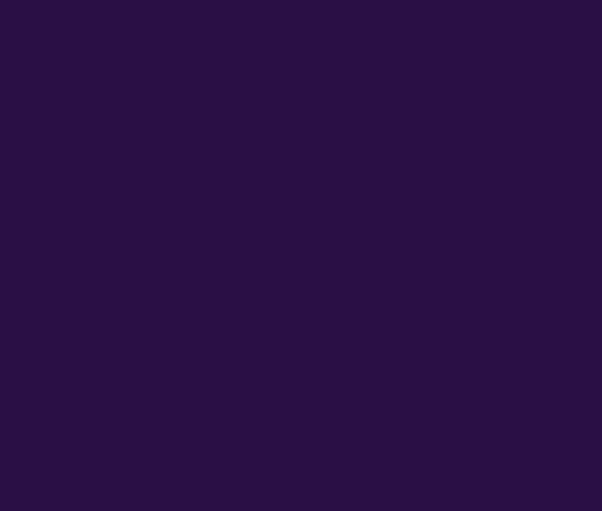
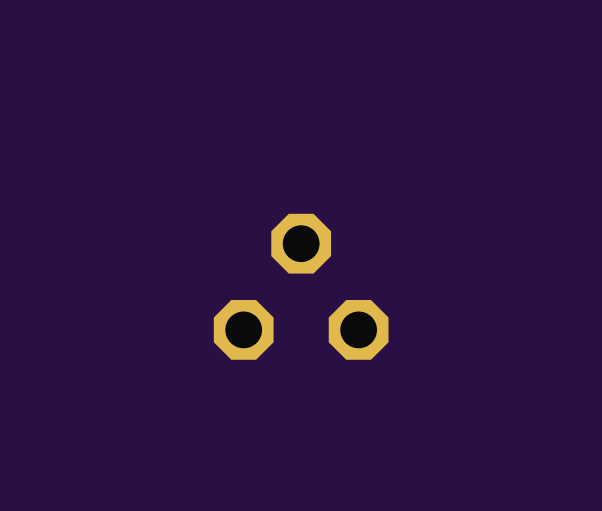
part: none -> (301, 286)

